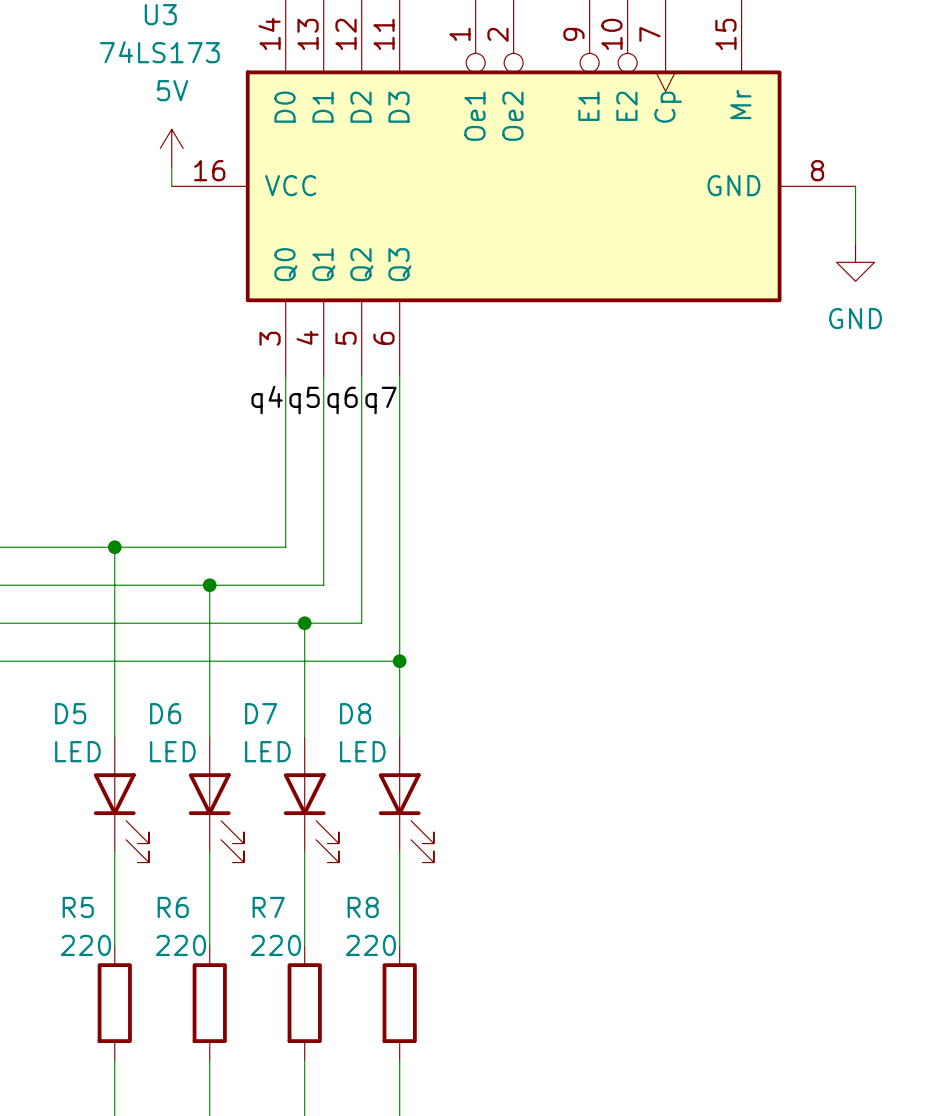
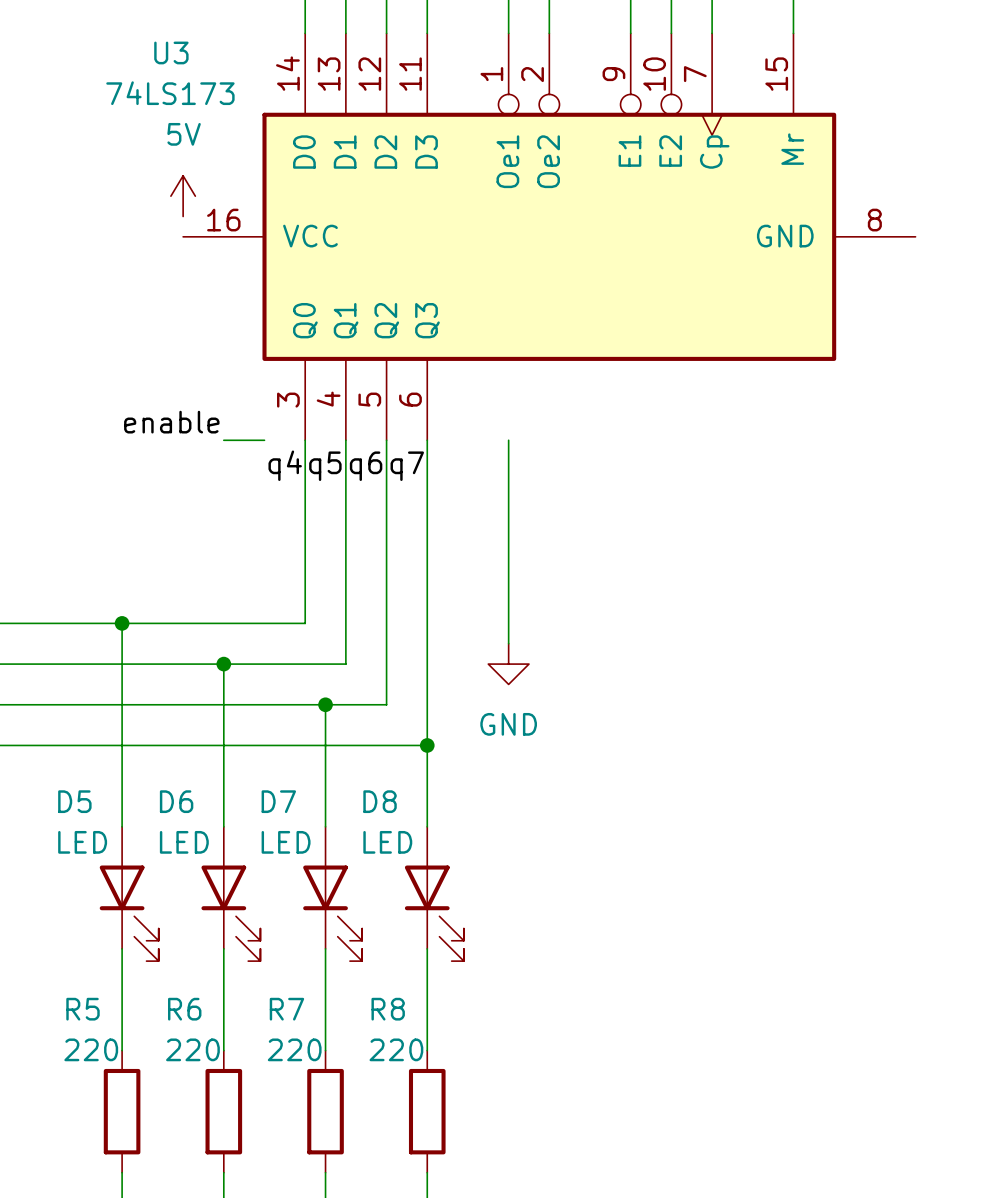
wire: (171, 167) (171, 186) -> none
wire: (855, 186) (855, 243) -> none
power symbol: GND (855, 262) -> none
label: none -> enable (171, 422)
wire: none -> (223, 440) (264, 440)
wire: none -> (508, 440) (508, 643)
power symbol: none -> GND (508, 664)

